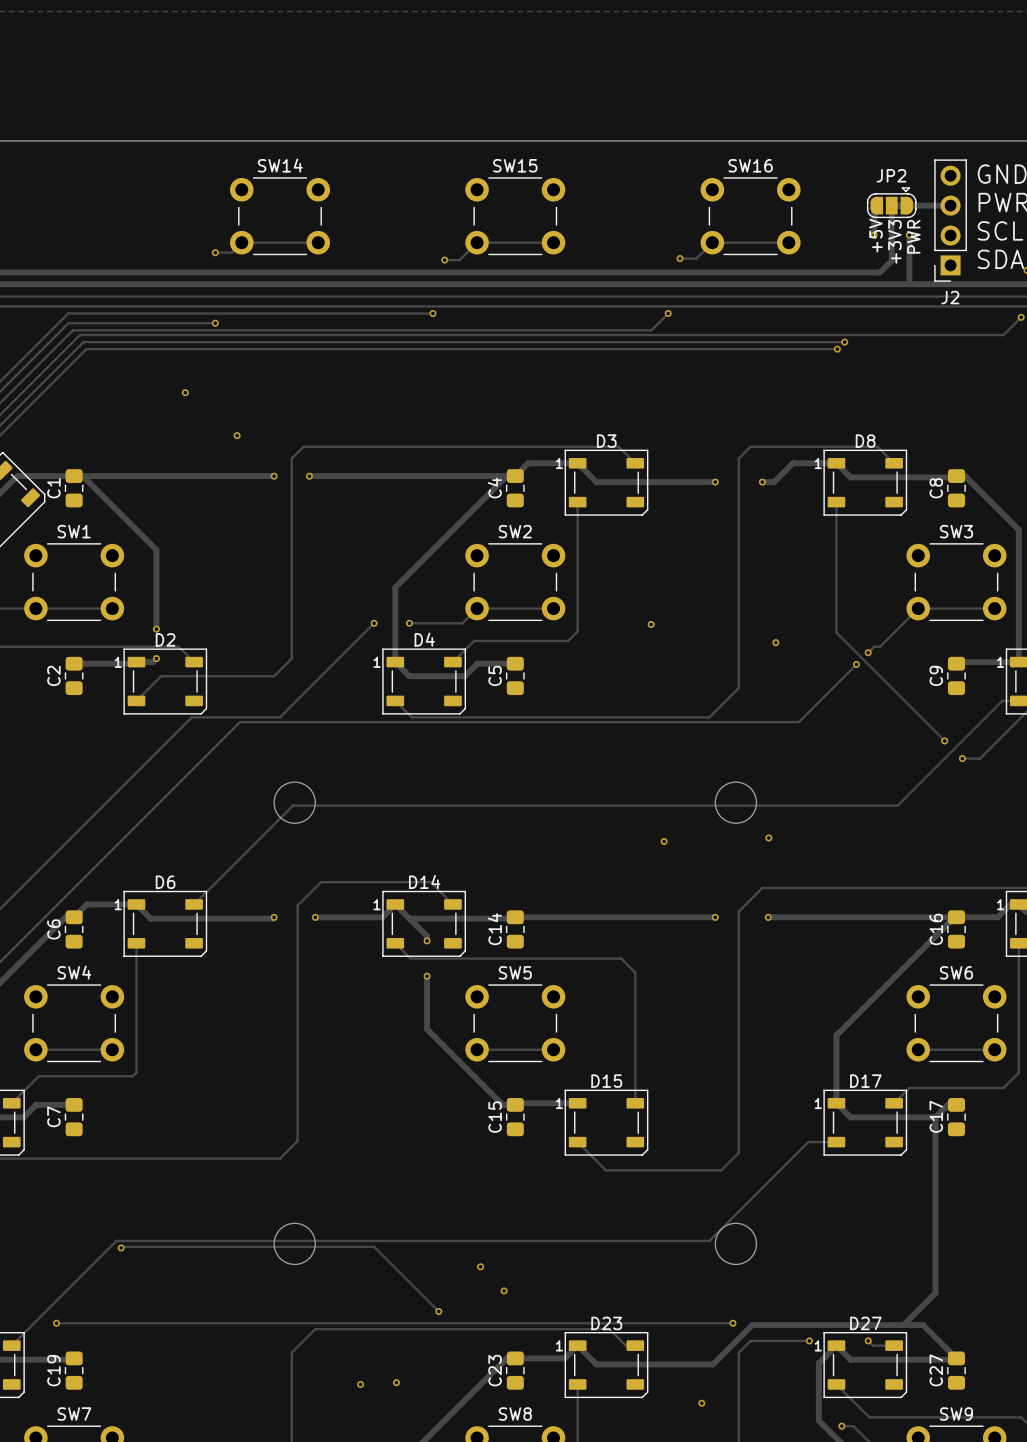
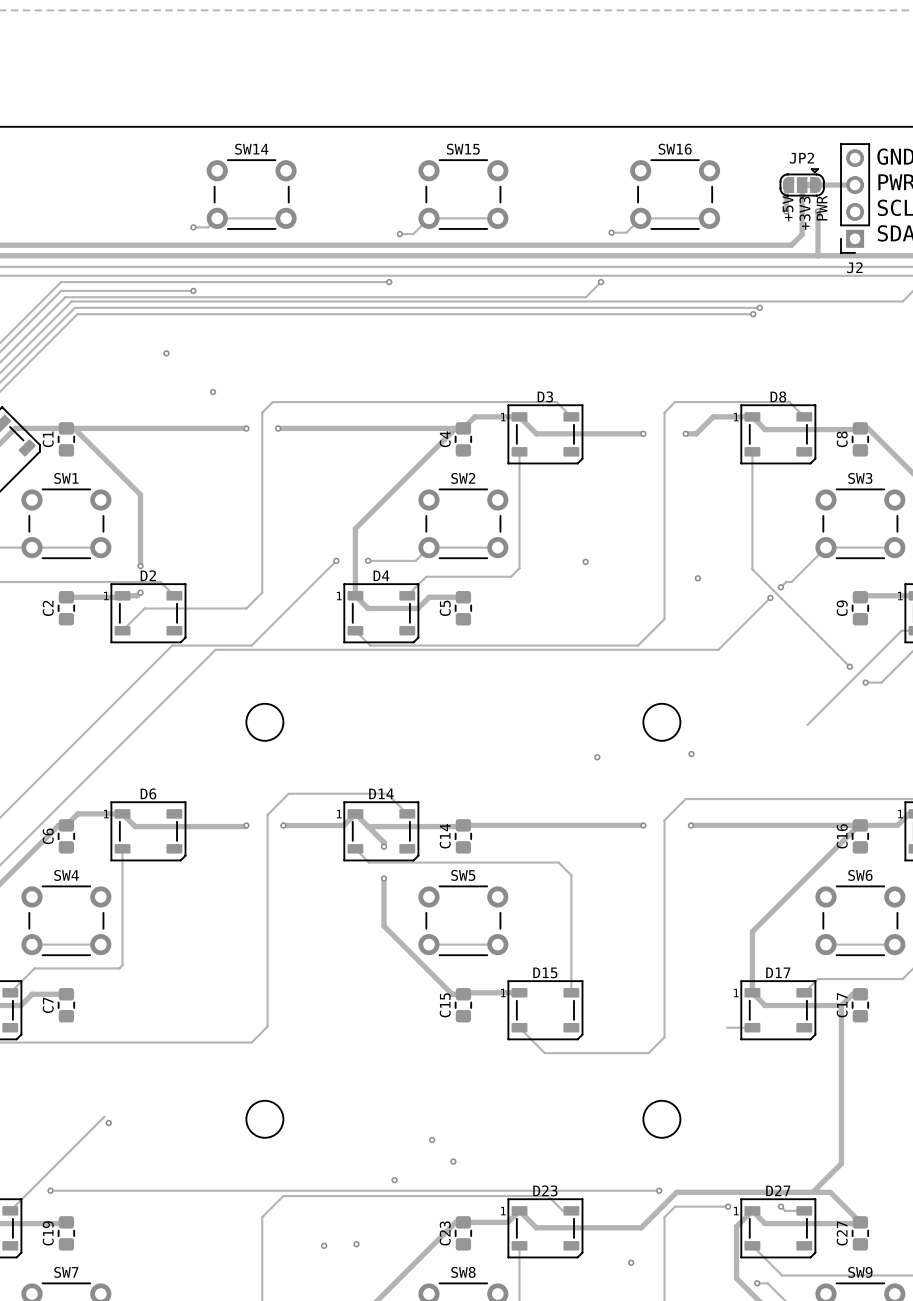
track: (897, 805) (292, 805) (194, 904) -> none
track: (808, 1142) (709, 1240) (116, 1240) -> none
track: (122, 1246) (374, 1246) (438, 1311) -> none

